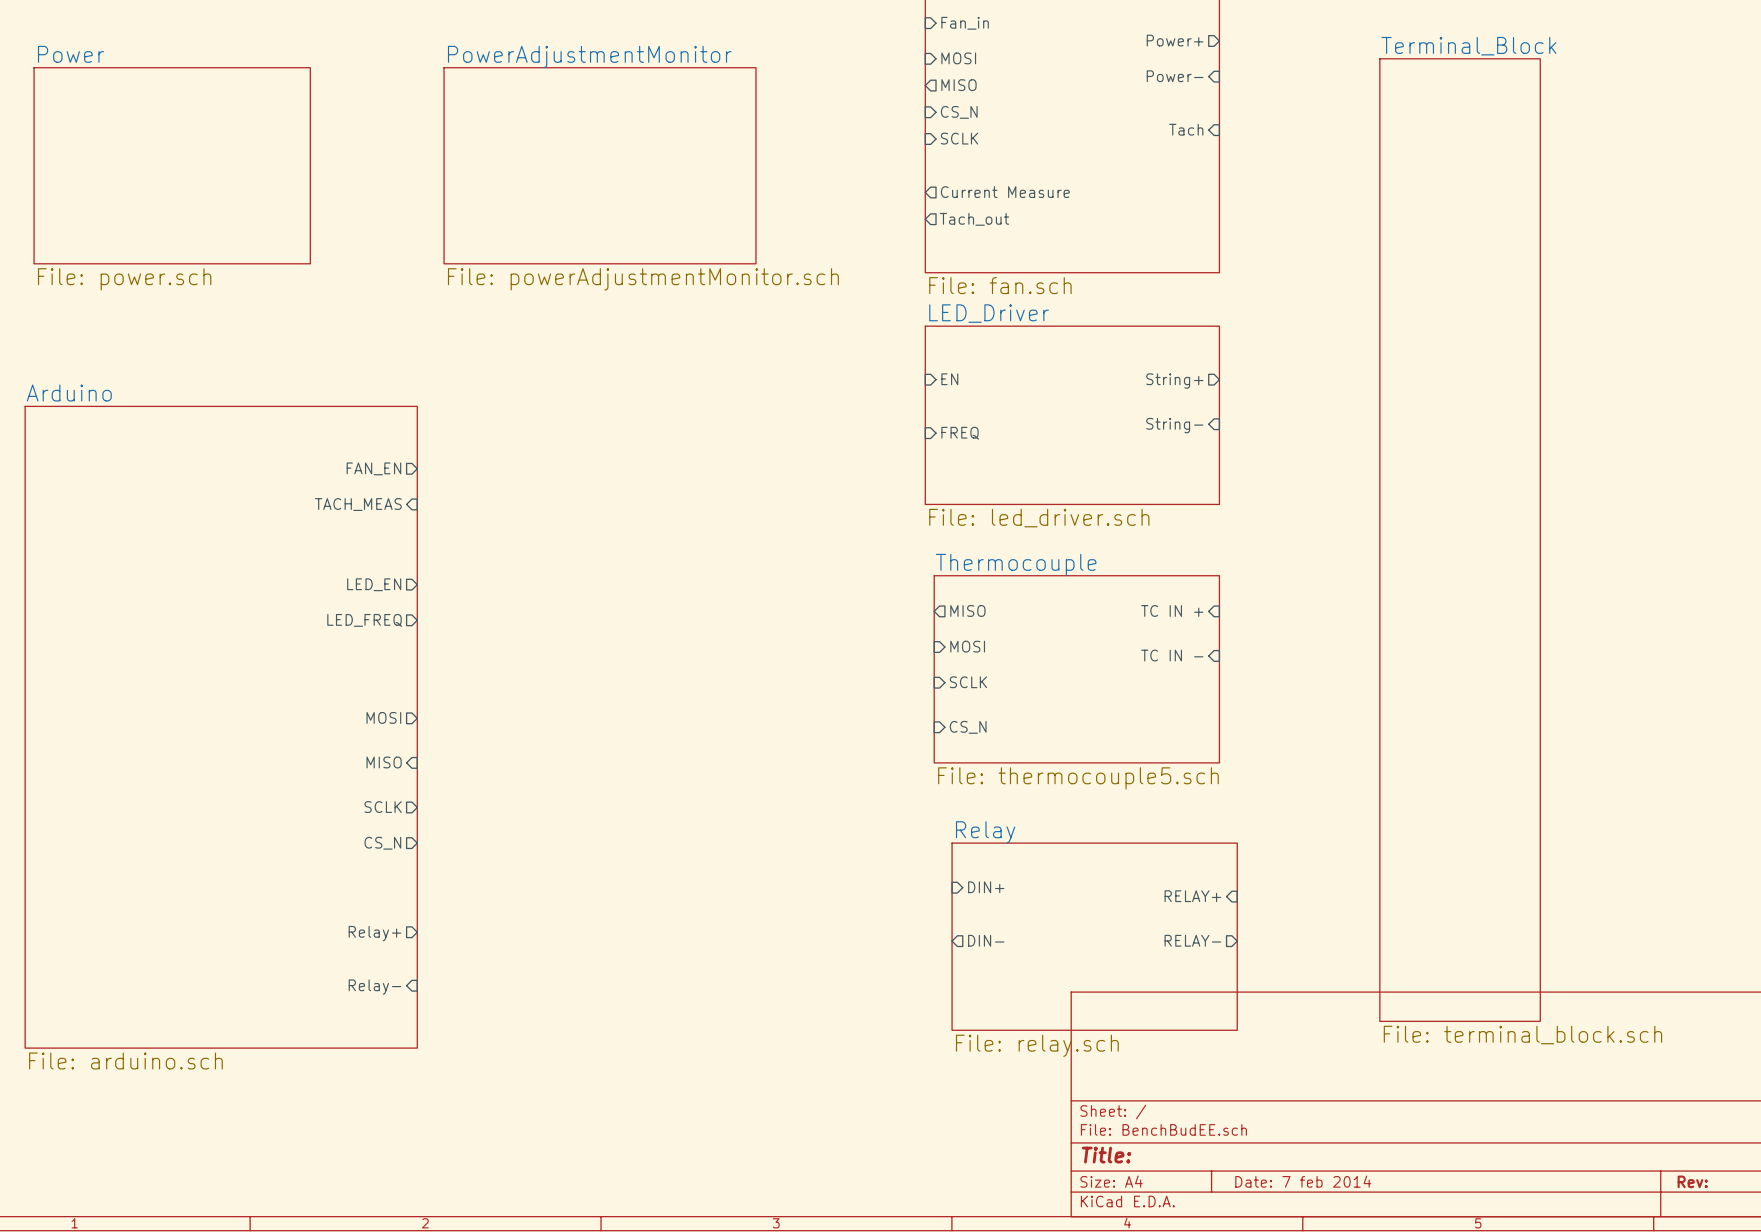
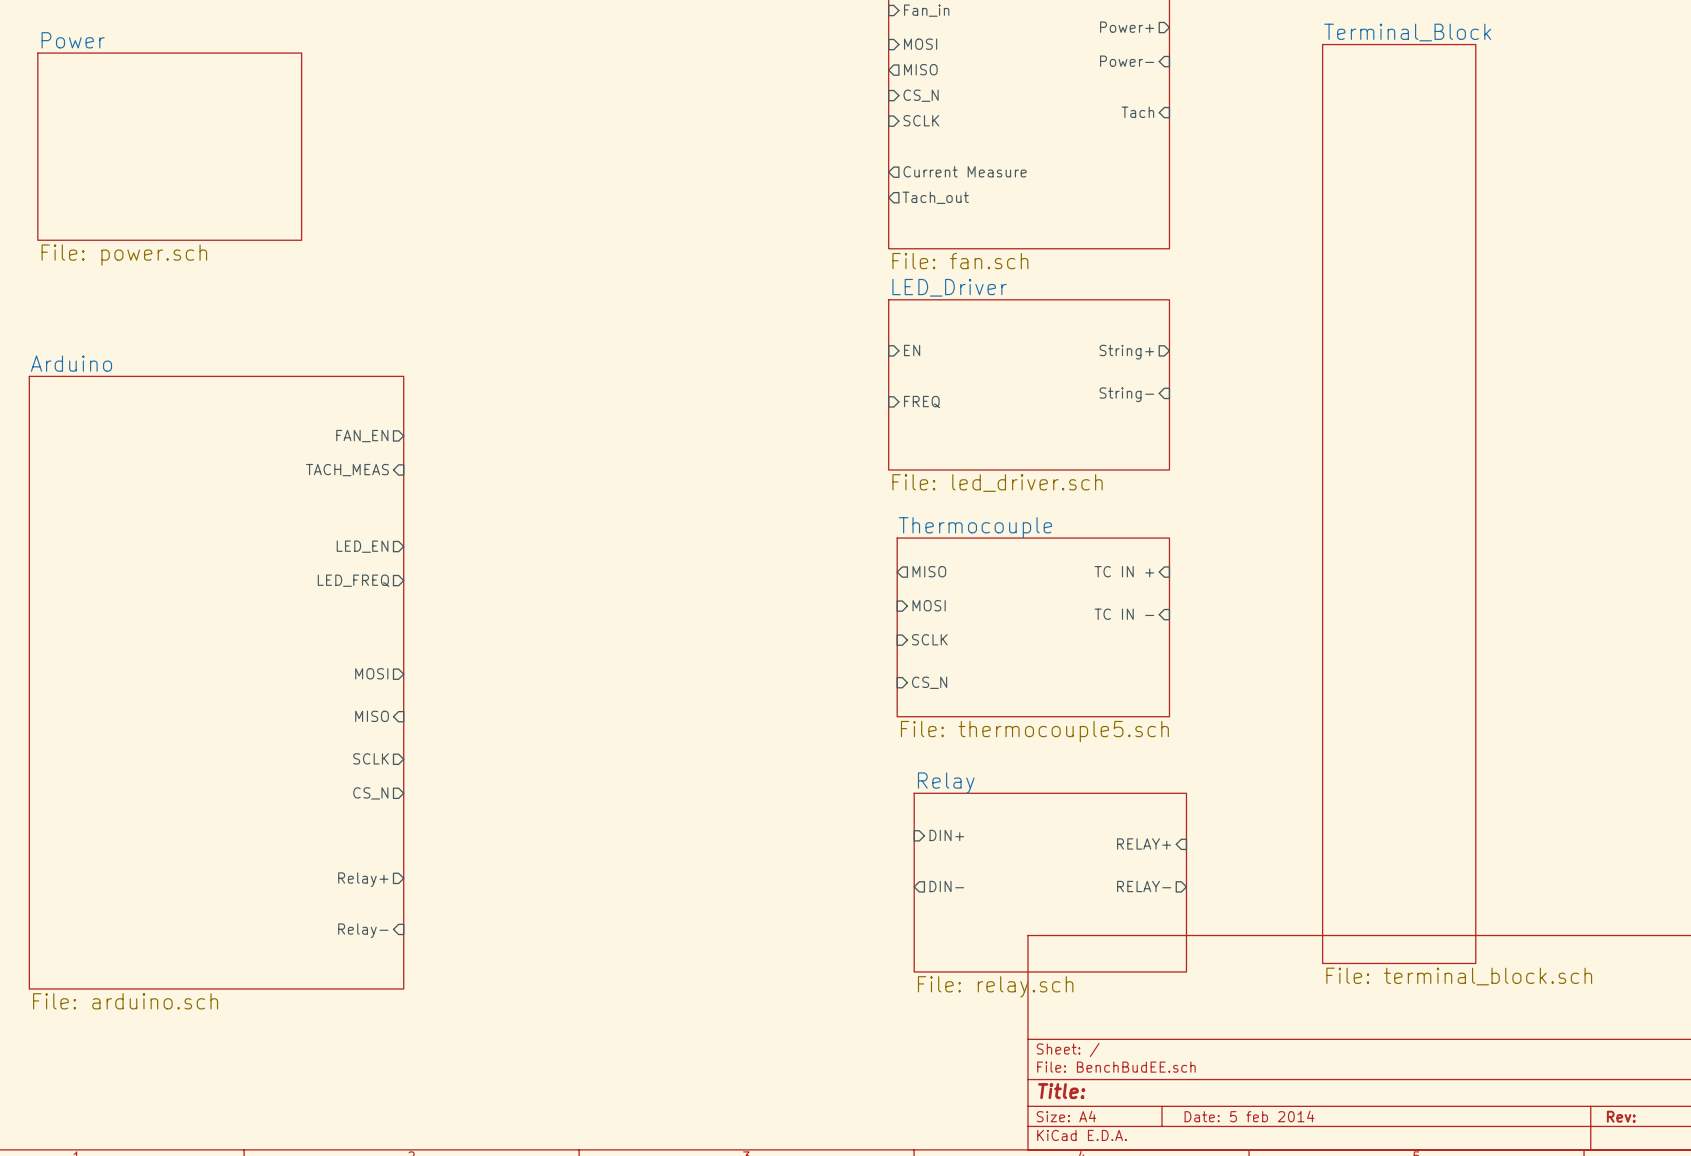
sheet PowerAdjustmentMonitor: File: powerAdjustmentMonitor.sch (600, 165) -> none
title block: Date: 7 feb 2014 (1303, 1181) -> Date: 5 feb 2014 (1249, 1116)

